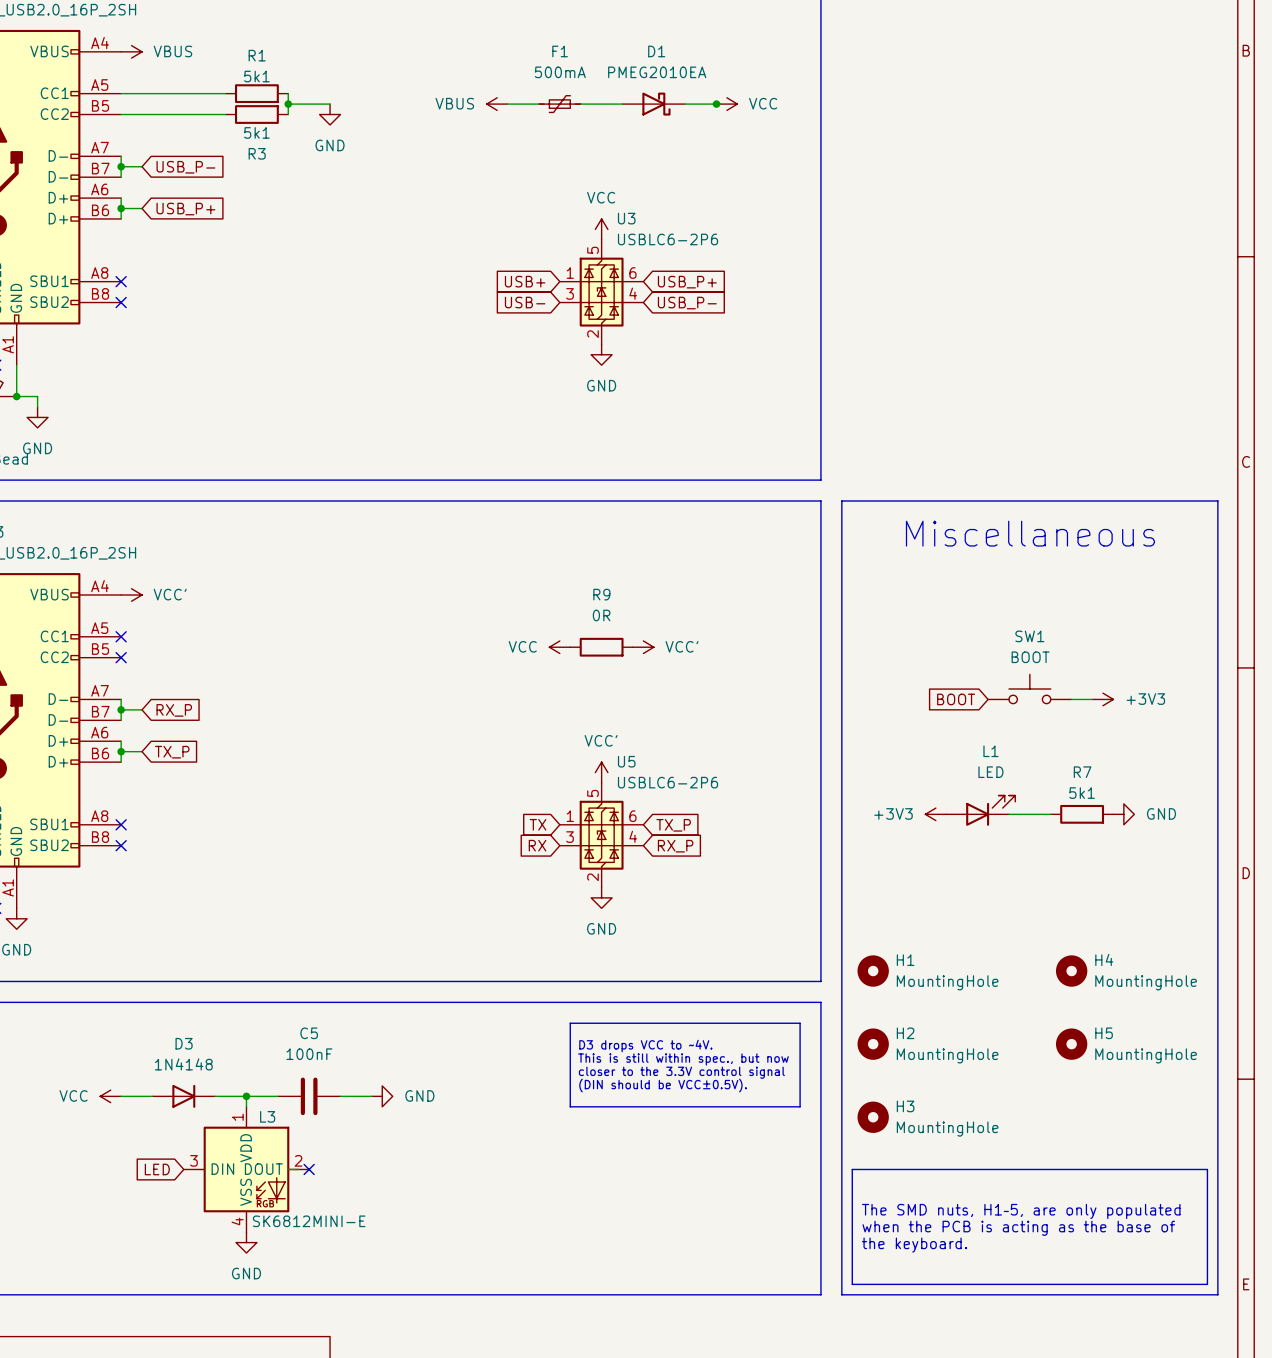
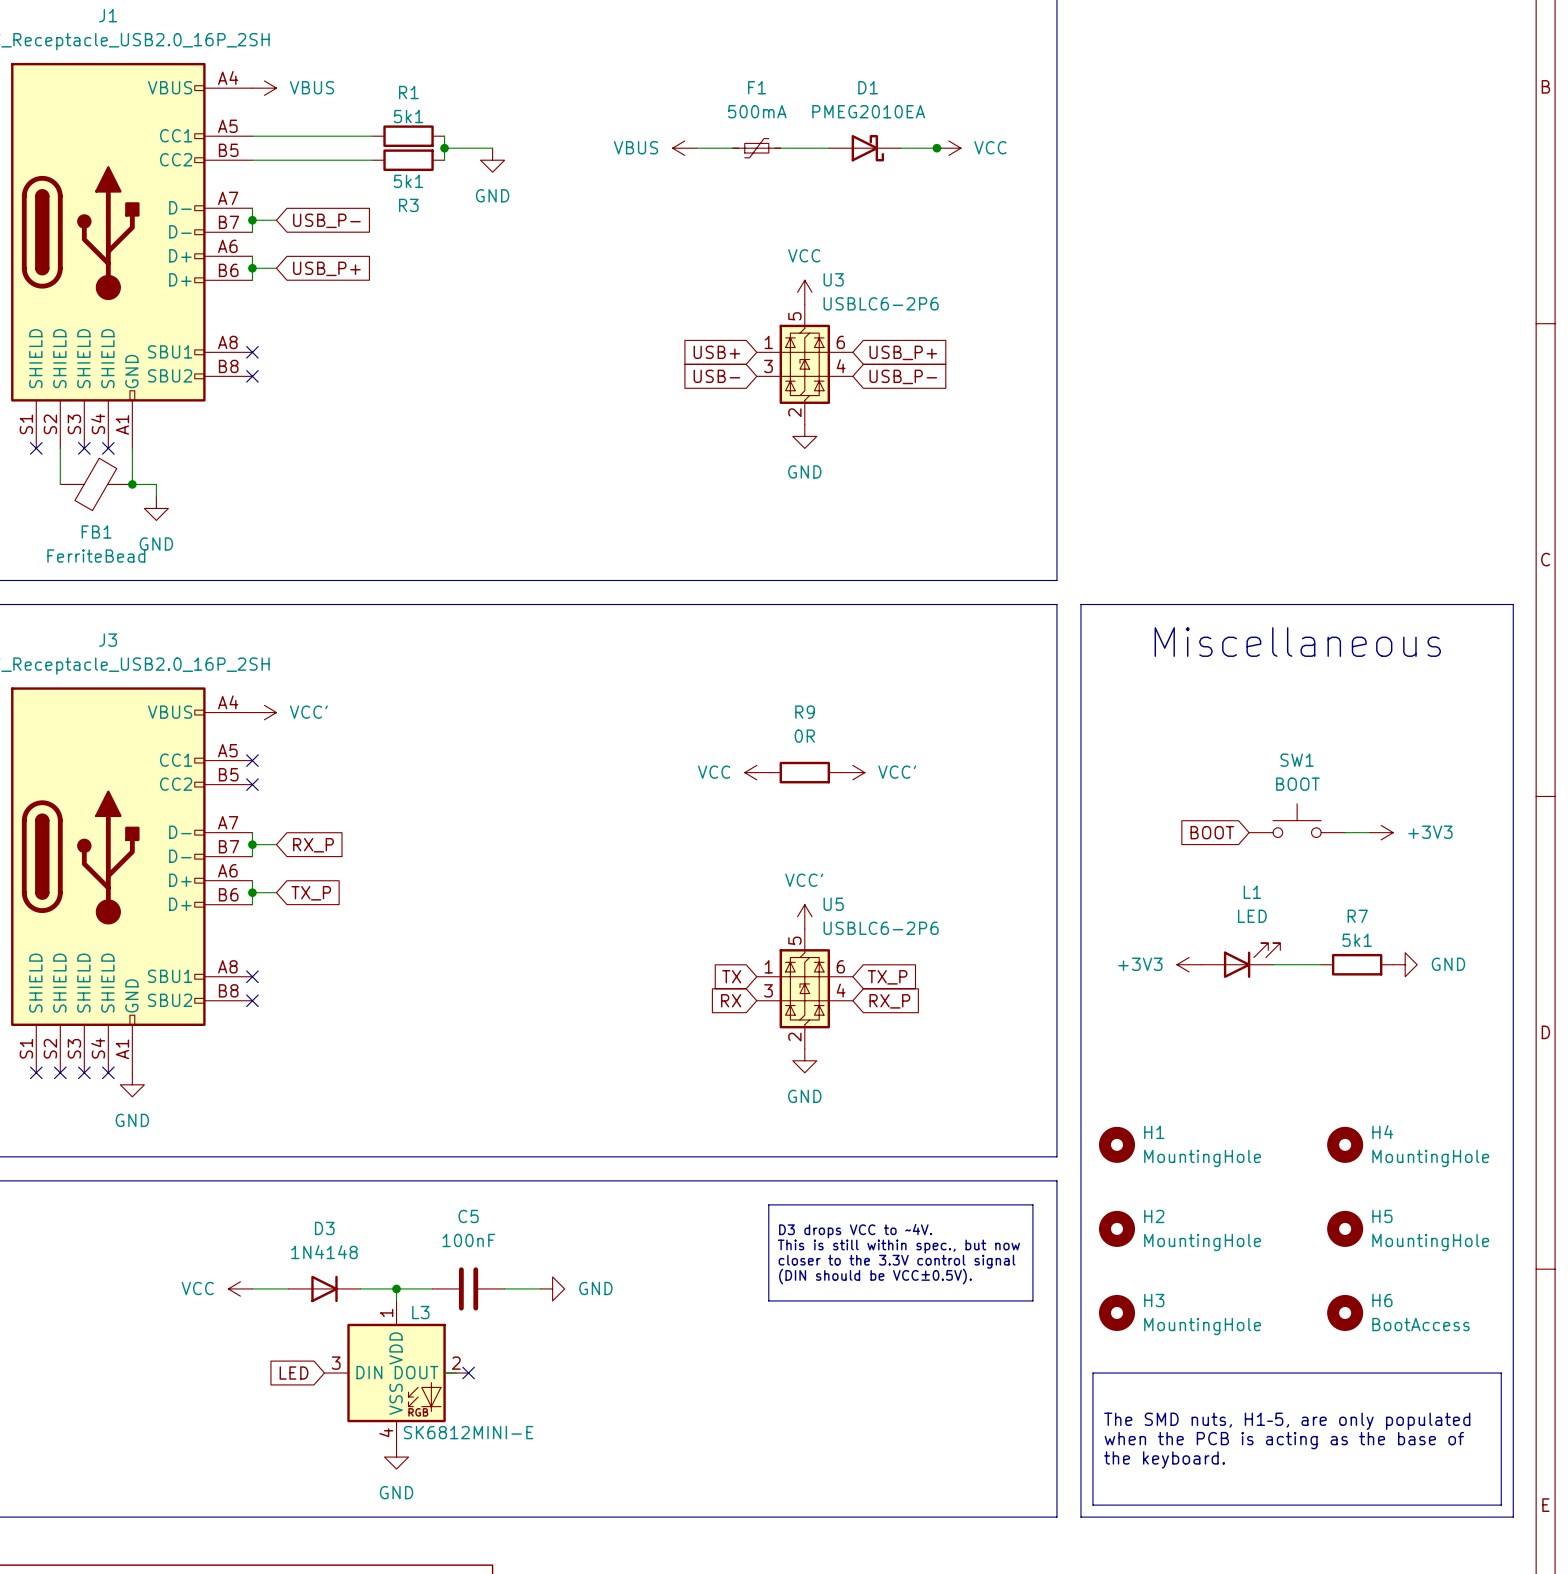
H6: none -> BootAccess (1345, 1312)

